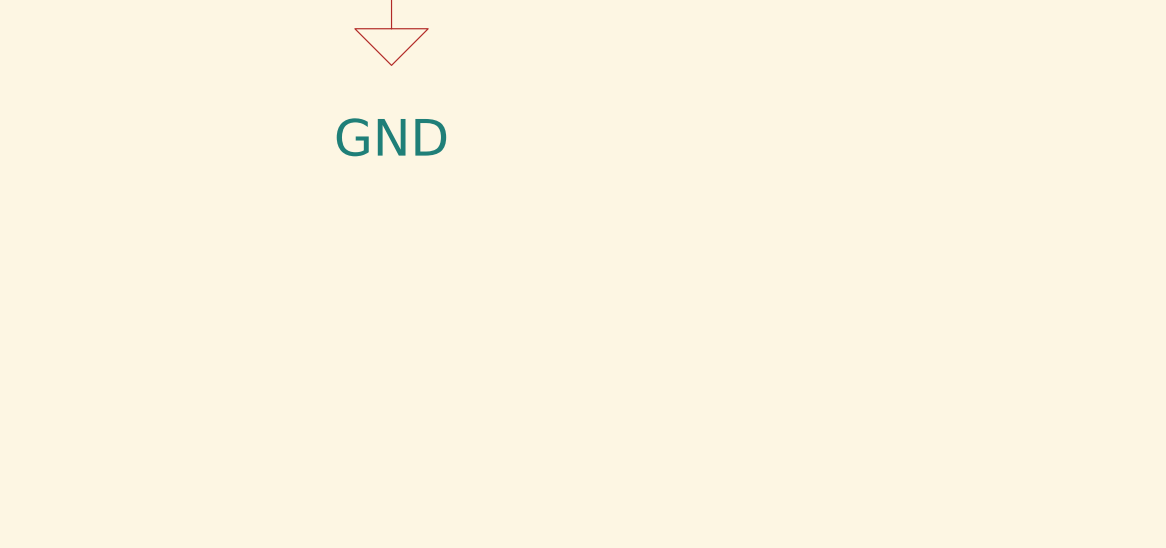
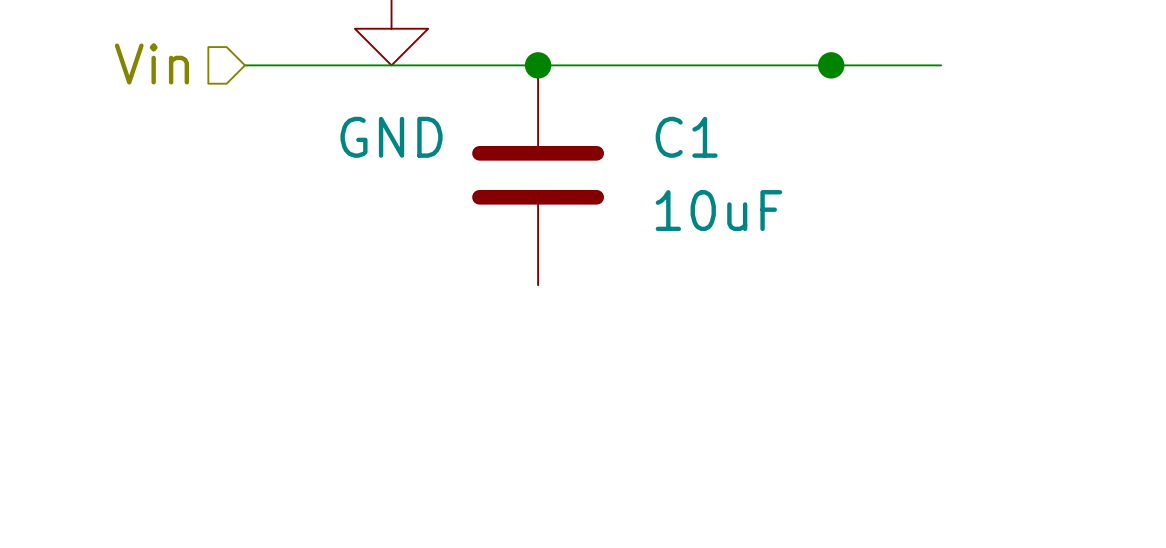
hierarchical label: none -> Vin (151, 64)
wire: none -> (244, 65) (941, 65)
junction: none -> (538, 65)
junction: none -> (831, 65)
C1: none -> 10uF (538, 175)

